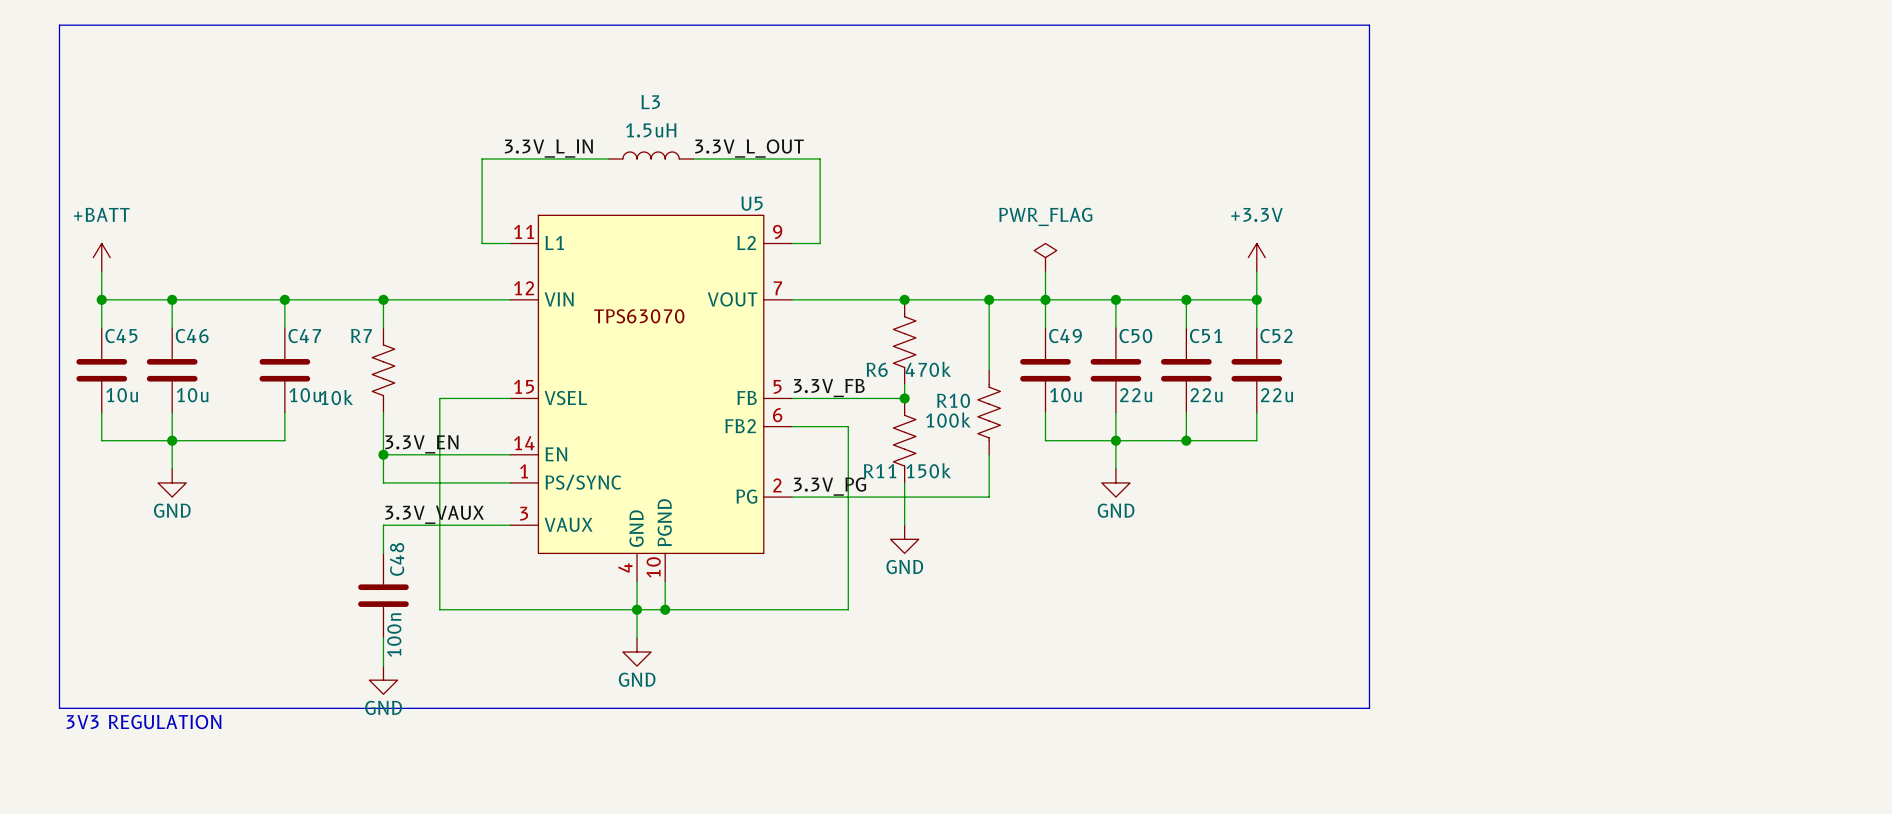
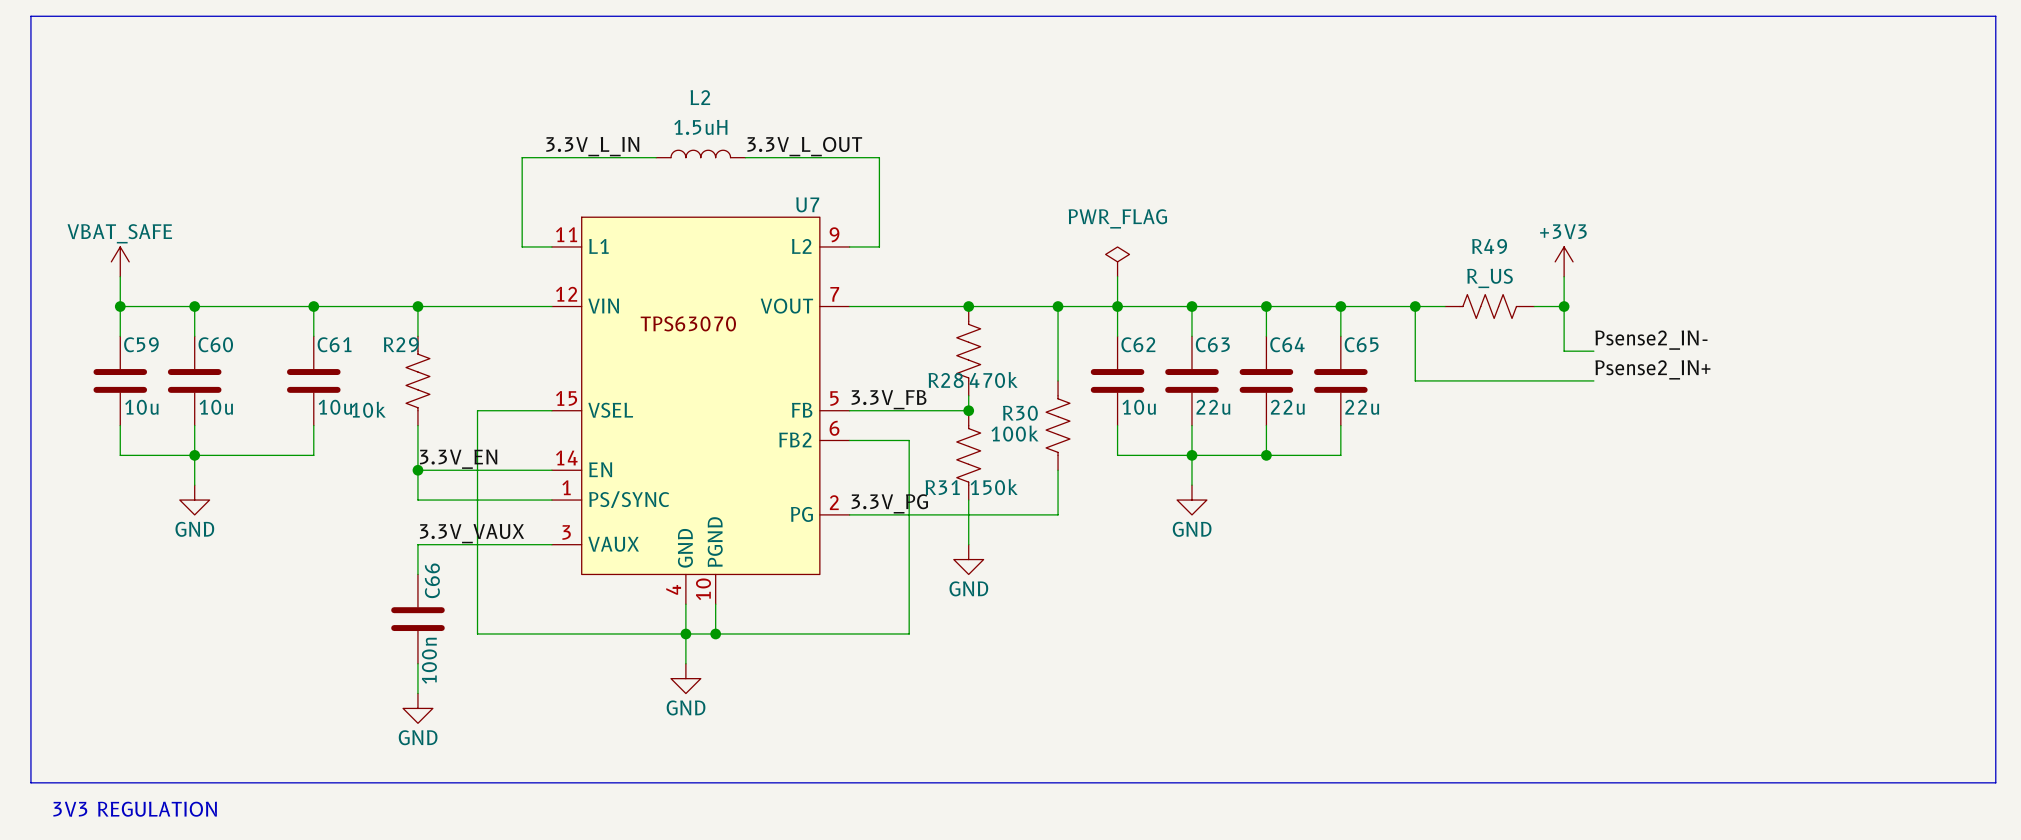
line: (59, 25) (59, 708) (1369, 708) (1369, 25) -> (75, 16) (30, 16) (30, 782) (1995, 782) (1995, 16) (1459, 16)
L3 name: L3 (650, 102) -> L2 (700, 97)
U5 name: U5 (752, 203) -> U7 (807, 204)
power symbol: +BATT (101, 257) -> VBAT_SAFE (120, 261)
power symbol: +3.3V (1256, 257) -> none
power symbol: none -> +3V3 (1564, 261)
wire: (1256, 271) (1256, 299) -> (1445, 306) (1340, 306)
wire: none -> (1564, 276) (1564, 351) (1593, 351)
wire: none -> (1415, 306) (1415, 380) (1593, 380)
junction: none -> (1415, 306)
R49: none -> R_US (1489, 306)
wire: none -> (1534, 306) (1564, 306)
junction: none -> (1564, 306)
label: none -> Psense2_IN- (1651, 340)
R7 name: R7 (361, 335) -> R29 (401, 344)
C45 name: C45 (121, 336) -> C59 (141, 344)
C46 name: C46 (192, 336) -> C60 (215, 344)
C47 name: C47 (304, 336) -> C61 (334, 344)
C49 name: C49 (1065, 336) -> C62 (1138, 344)
C50 name: C50 (1135, 336) -> C63 (1212, 344)
C51 name: C51 (1206, 336) -> C64 (1287, 344)
C52 name: C52 (1276, 336) -> C65 (1361, 344)
label: none -> Psense2_IN+ (1652, 369)
R6 name: R6 (877, 369) -> R28 (946, 380)
R10 name: R10 (953, 400) -> R30 (1020, 413)
R11 name: R11 (880, 471) -> R31 (942, 487)
C48 name: C48 (397, 559) -> C66 (432, 580)
text position: 3V3 REGULATION (143, 722) -> 3V3 REGULATION (135, 809)

